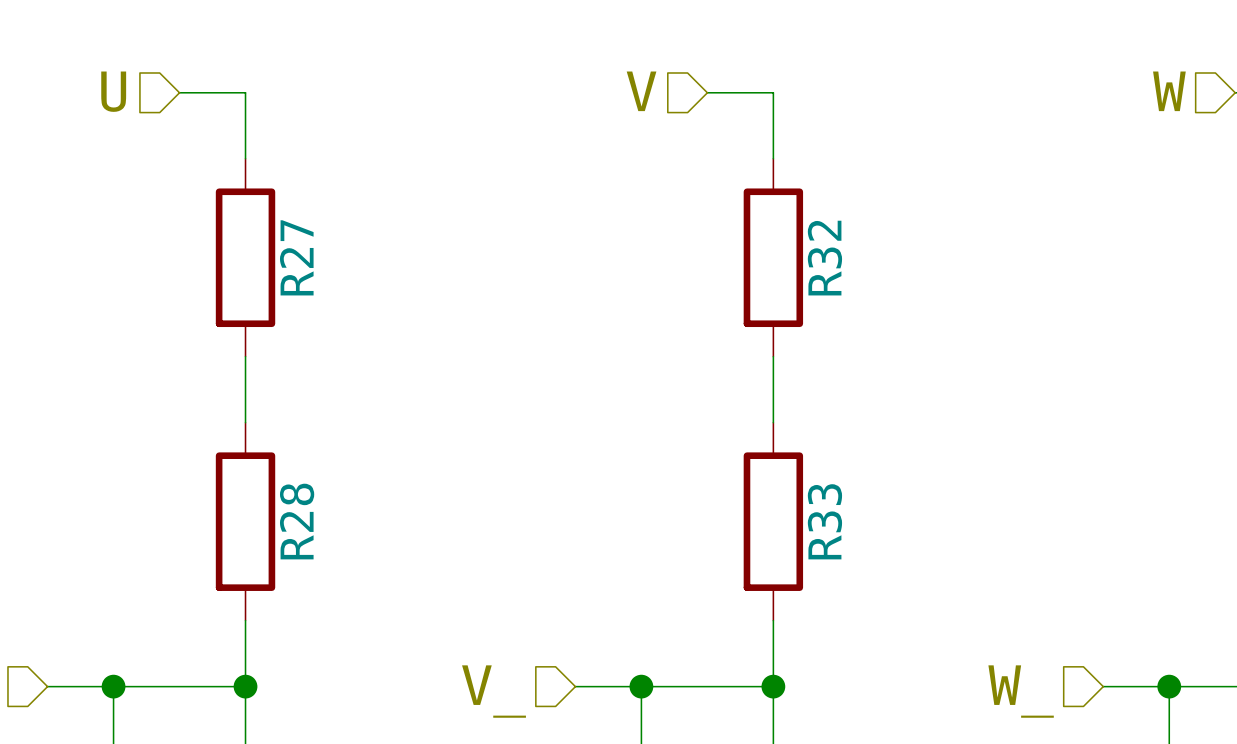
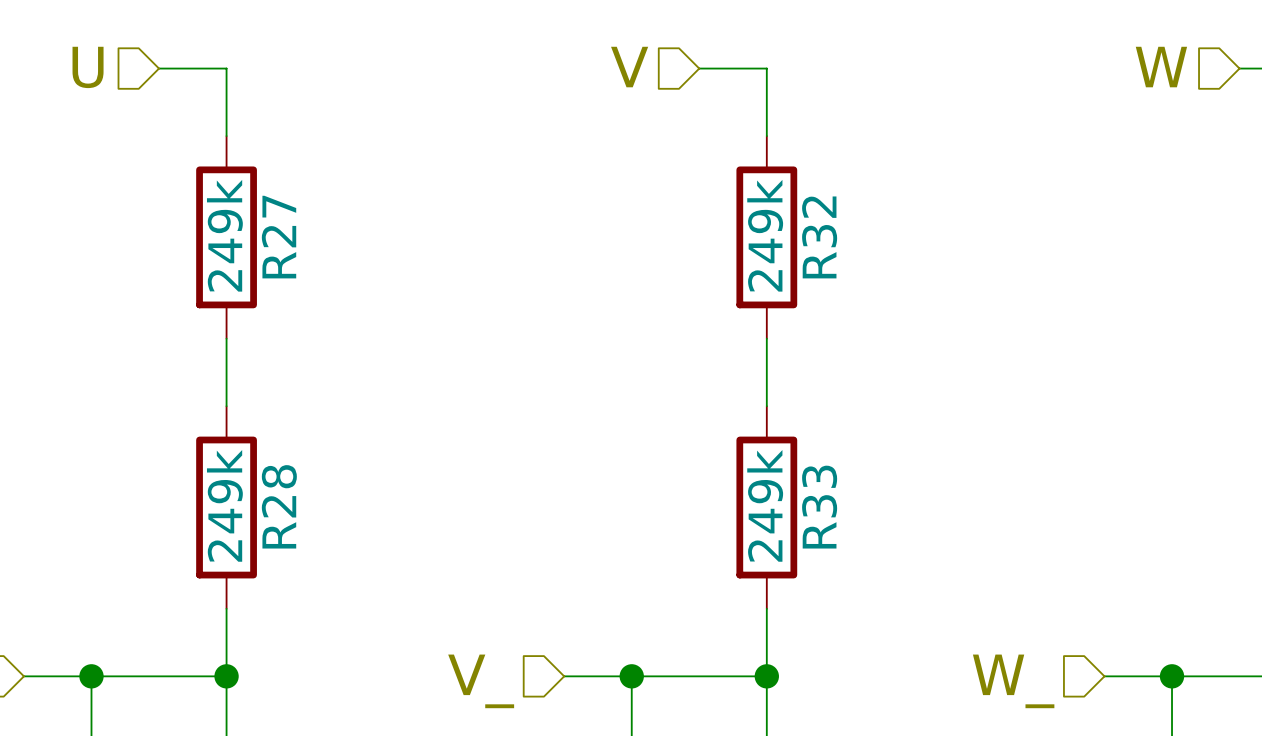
R27 value: none -> 249k (224, 235)
R32 value: none -> 249k (765, 235)
R28 value: none -> 249k (224, 505)
R33 value: none -> 249k (765, 505)

